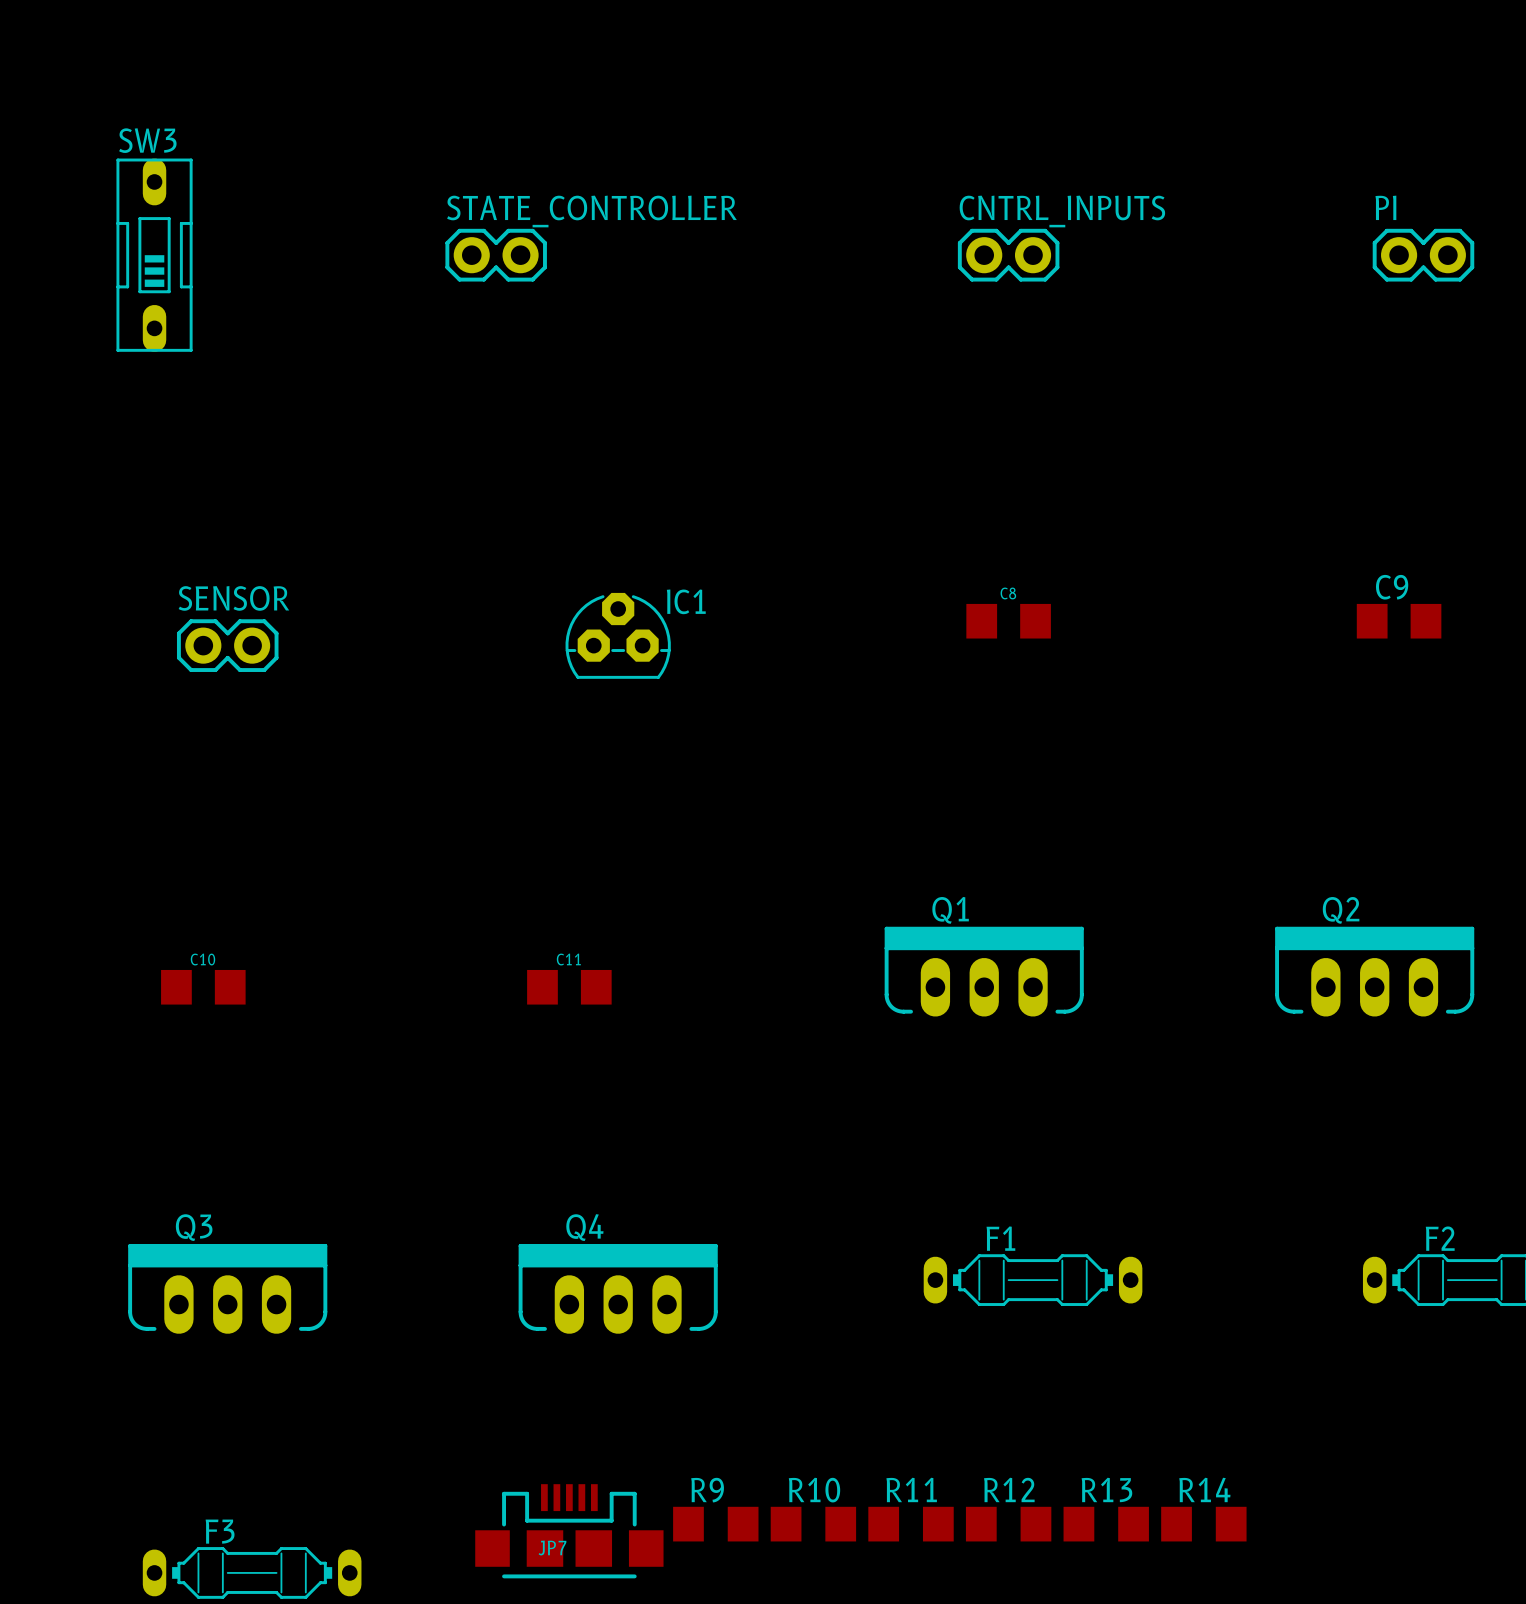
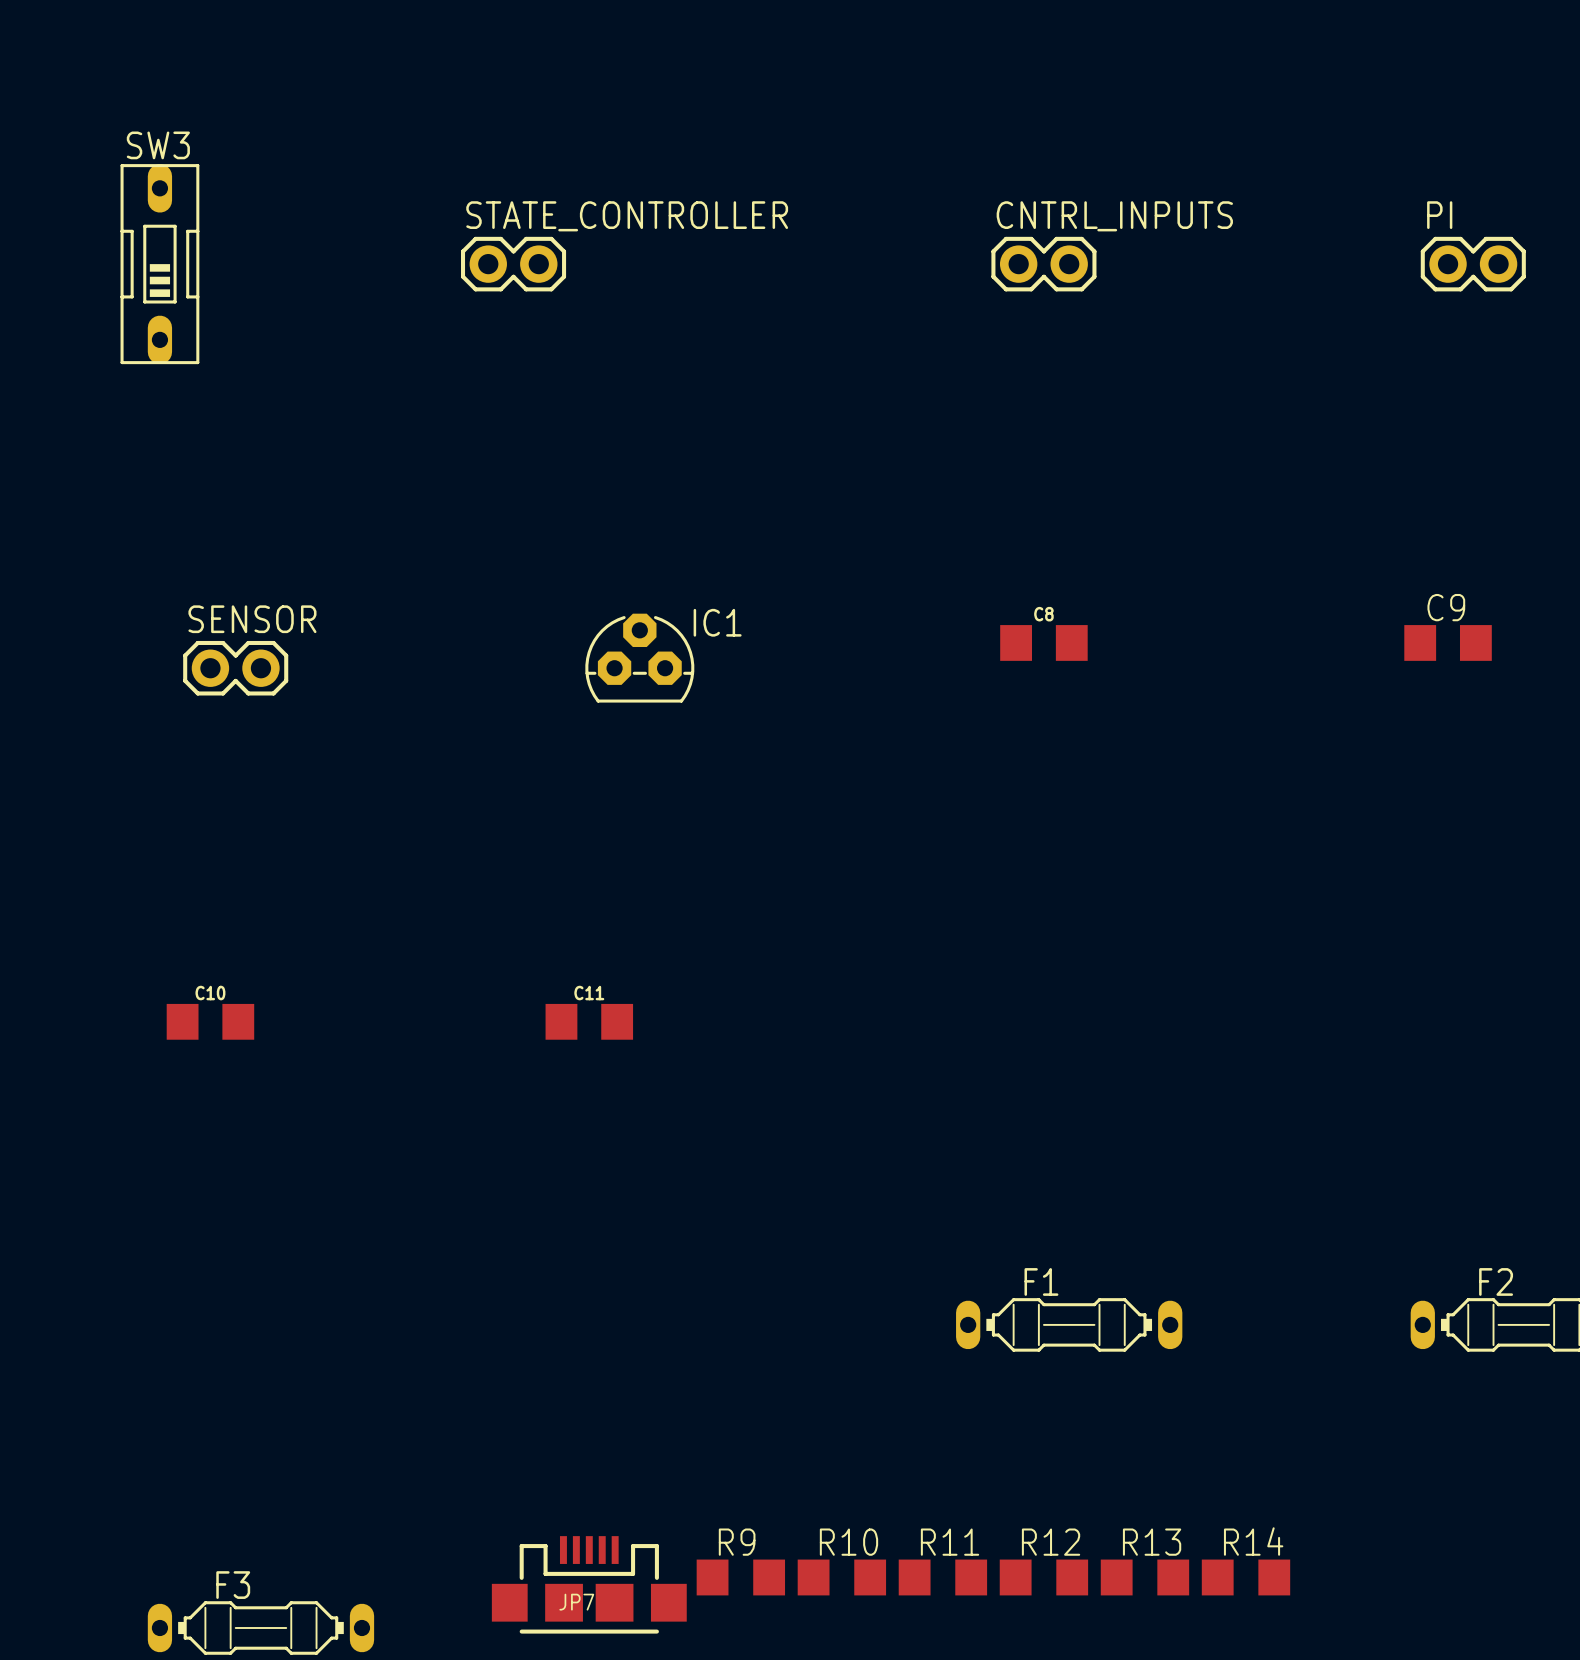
Q1: (984, 971) -> none
Q2: (1374, 971) -> none
Q3: (227, 1288) -> none
Q4: (618, 1288) -> none

